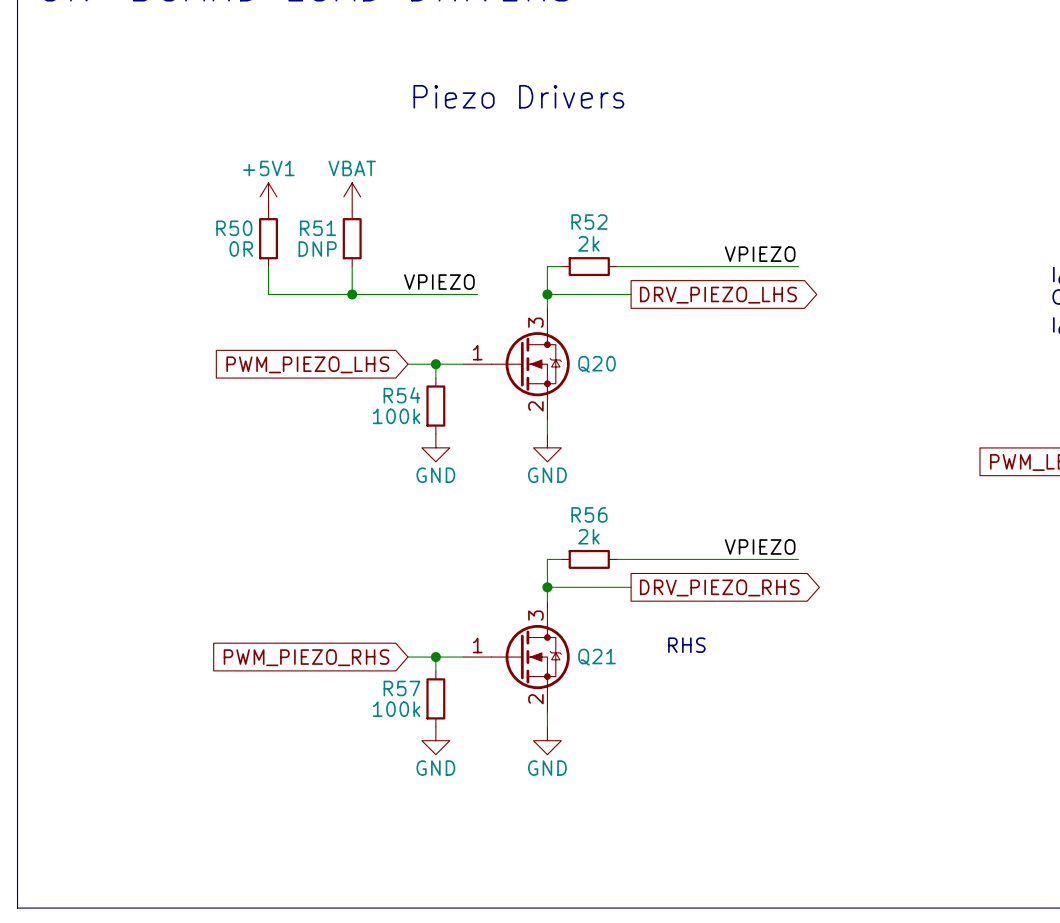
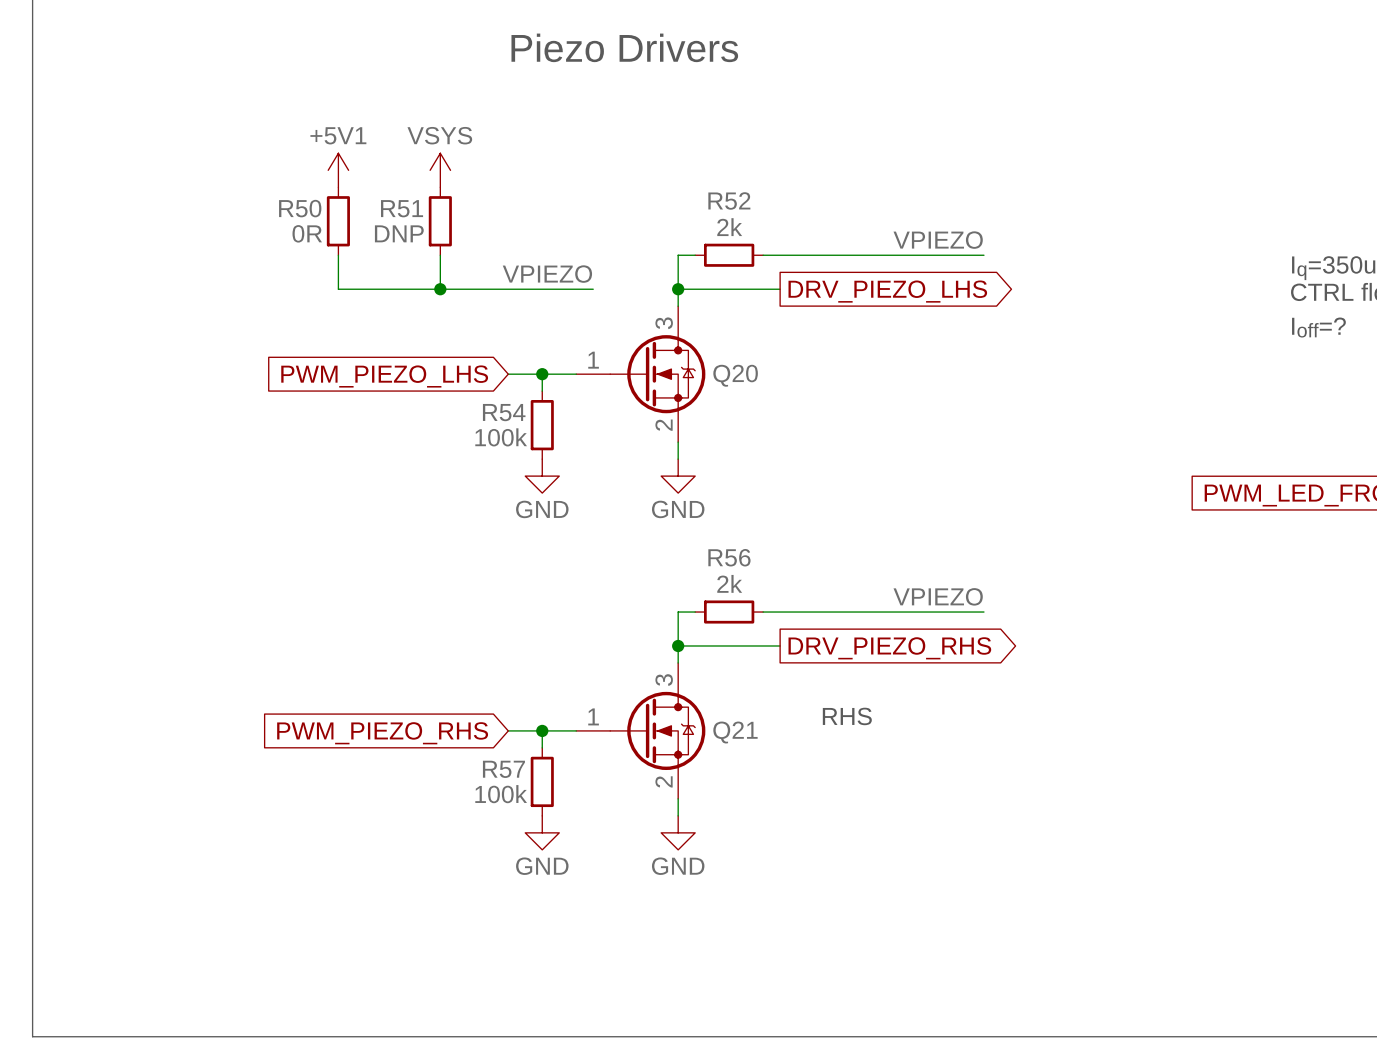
power symbol: VBAT (352, 196) -> VSYS (440, 170)

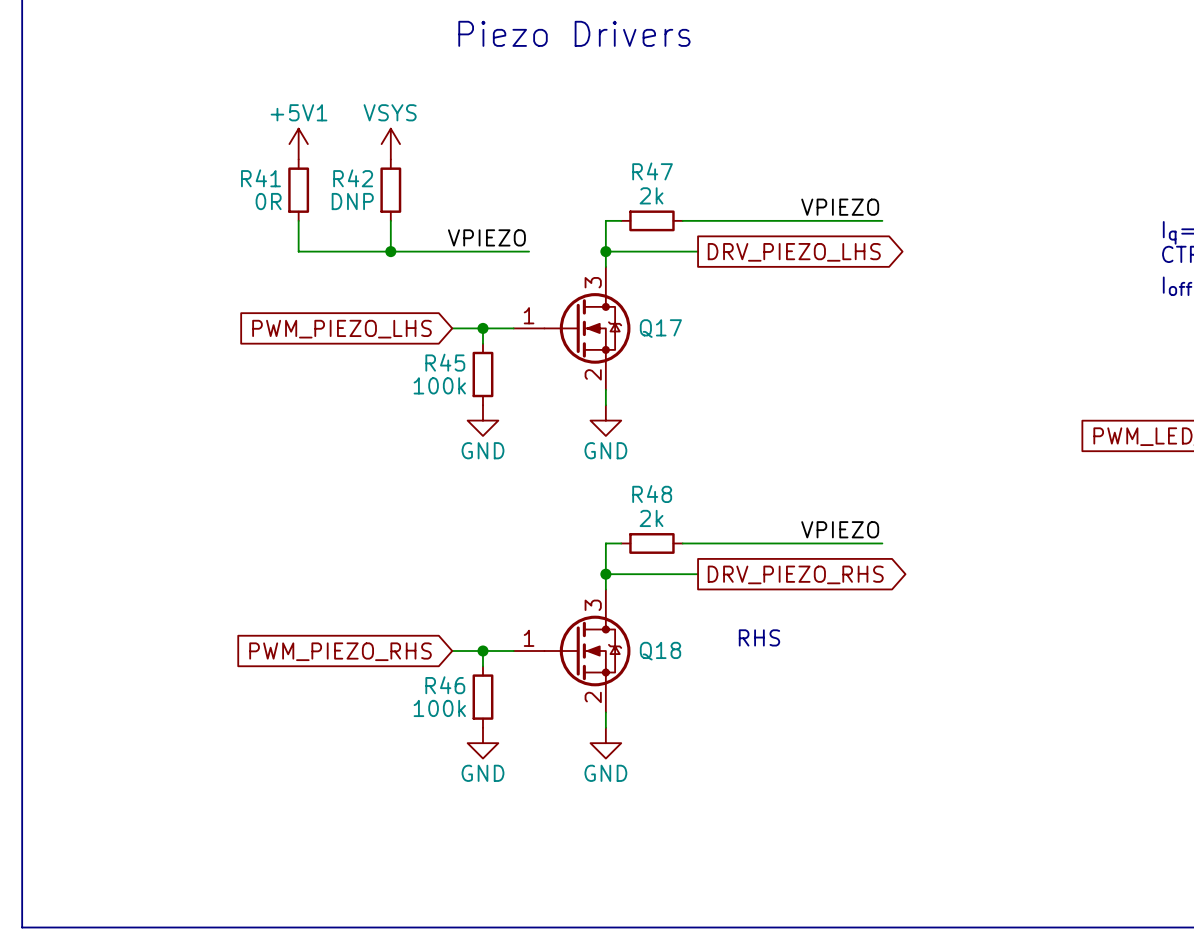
R52 name: R52 (729, 200) -> R47 (652, 171)
R50 name: R50 (300, 208) -> R41 (260, 178)
R51 name: R51 (402, 208) -> R42 (353, 178)
Q20 name: Q20 (735, 375) -> Q17 (660, 328)
R54 name: R54 (504, 412) -> R45 (445, 362)
R56 name: R56 (729, 557) -> R48 (652, 494)
Q21 name: Q21 (735, 732) -> Q18 (660, 651)
R57 name: R57 (503, 769) -> R46 (445, 685)

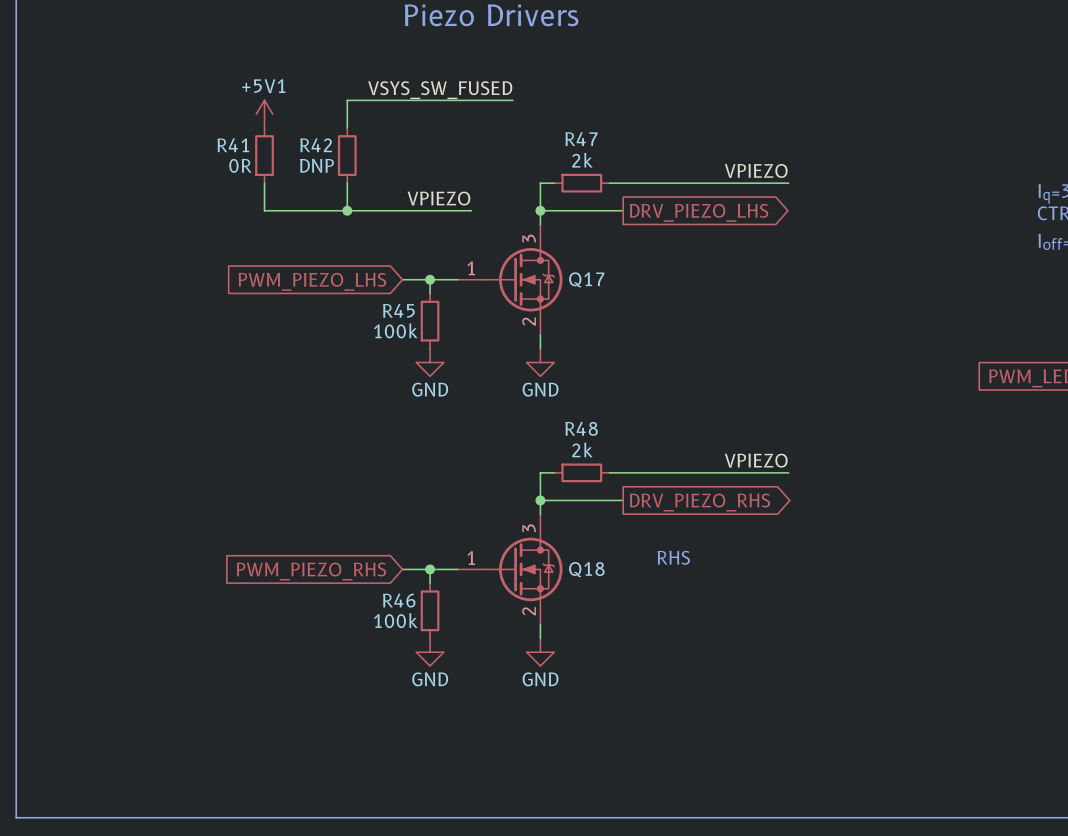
label: none -> VSYS_SW_FUSED (440, 90)
wire: none -> (512, 100) (347, 100) (347, 127)
power symbol: VSYS (390, 144) -> none

